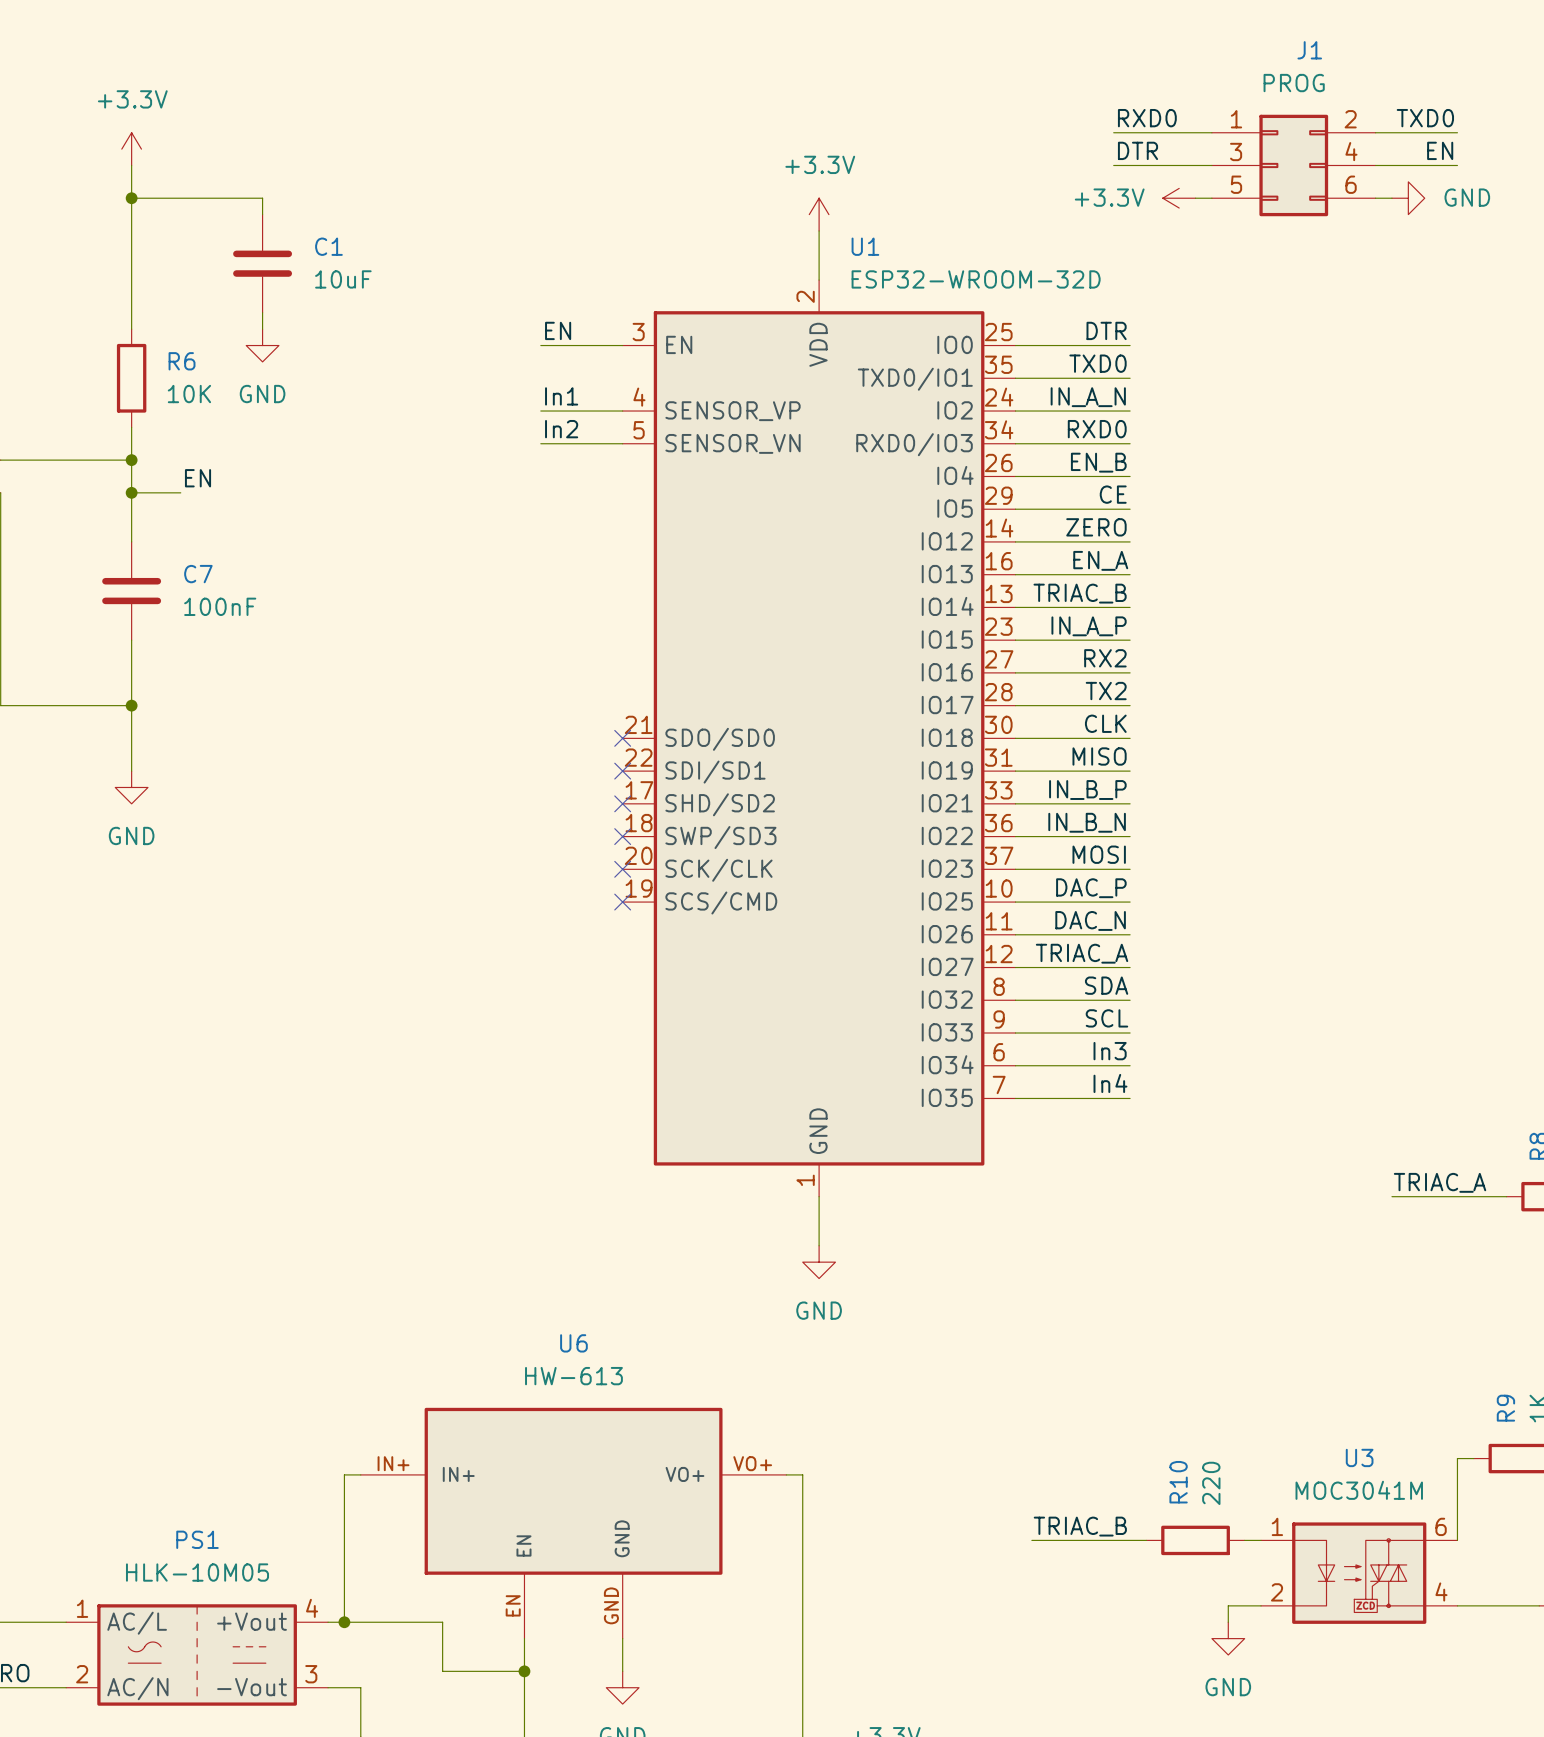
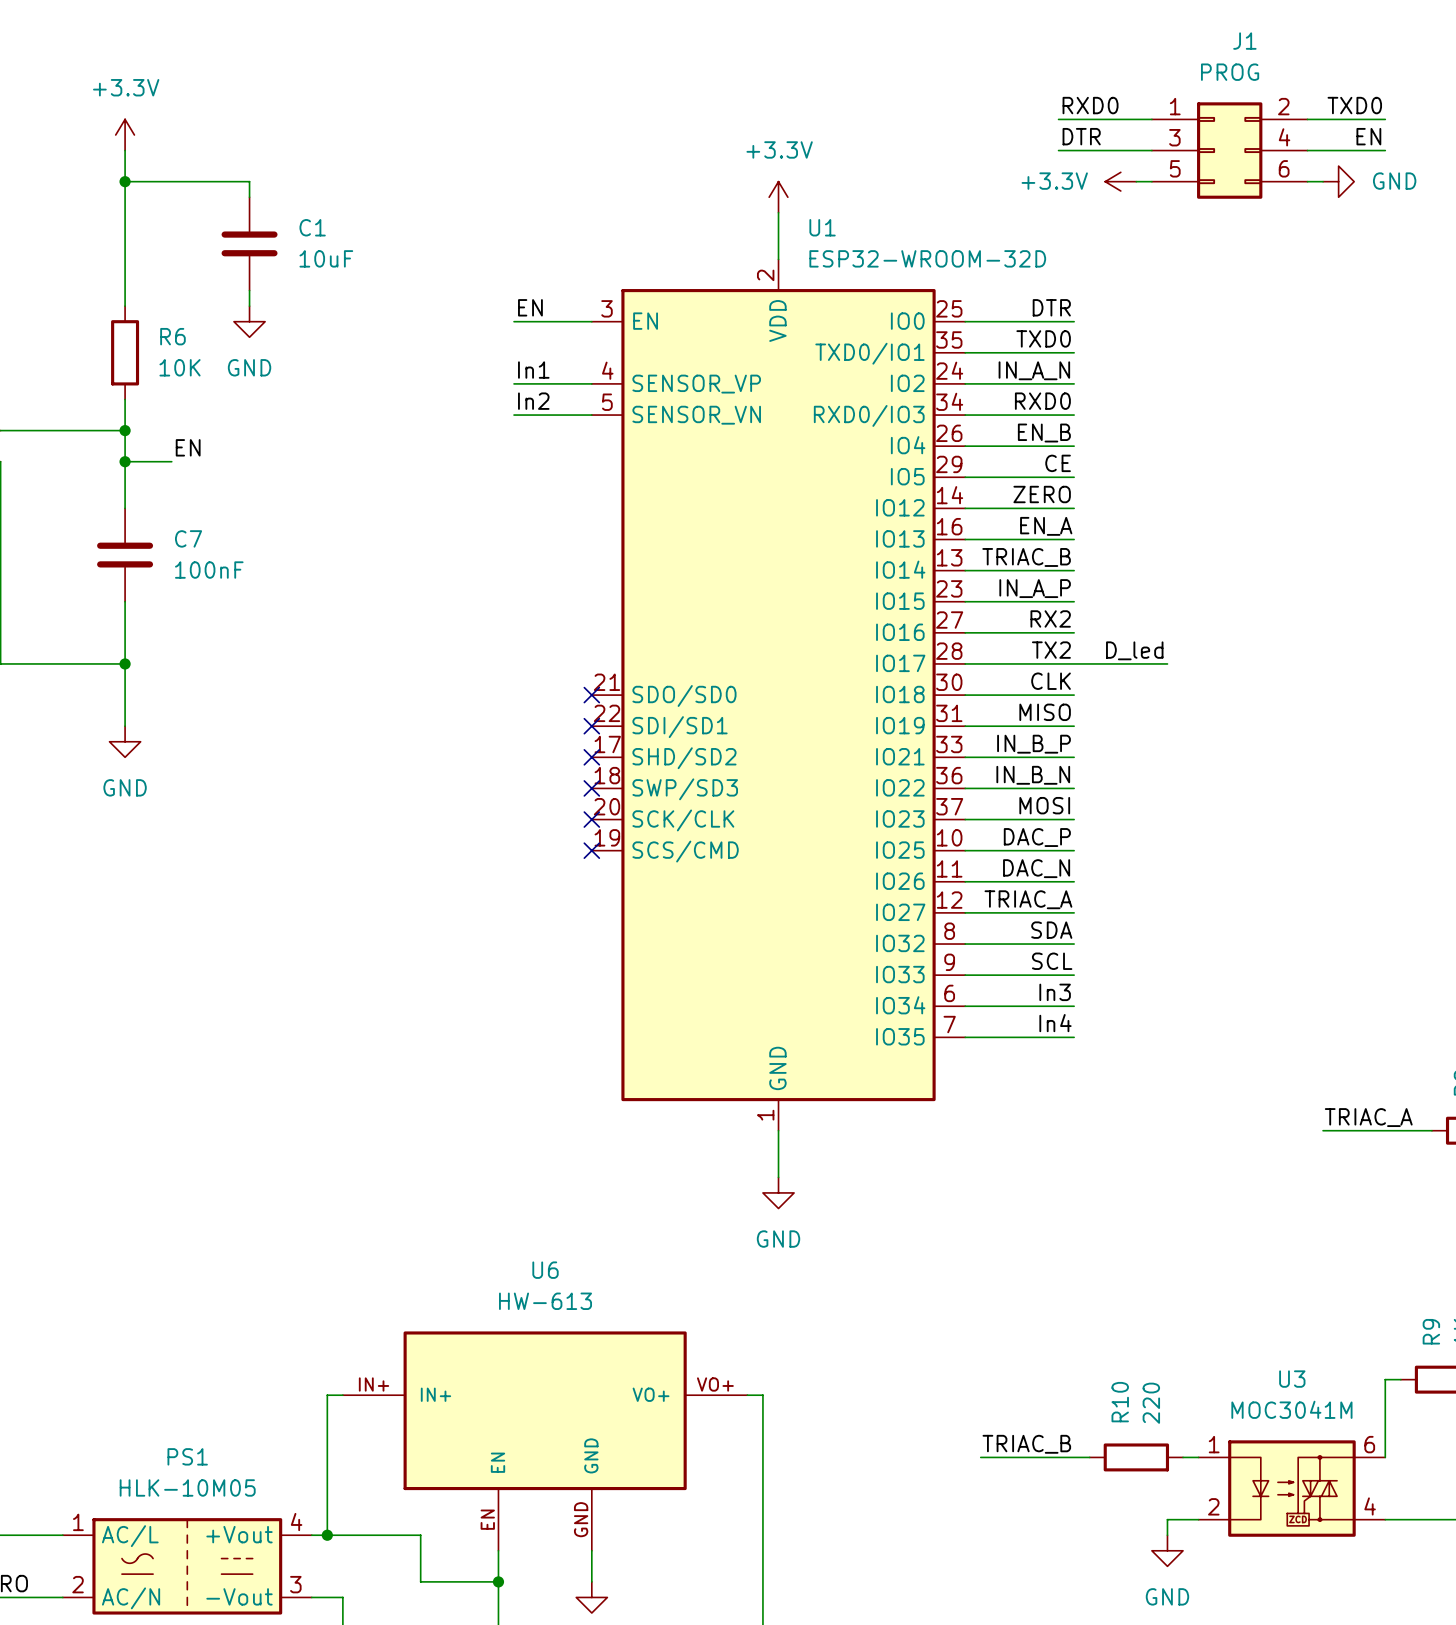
label: none -> D_led (1134, 650)
wire: none -> (1074, 663) (1167, 663)

